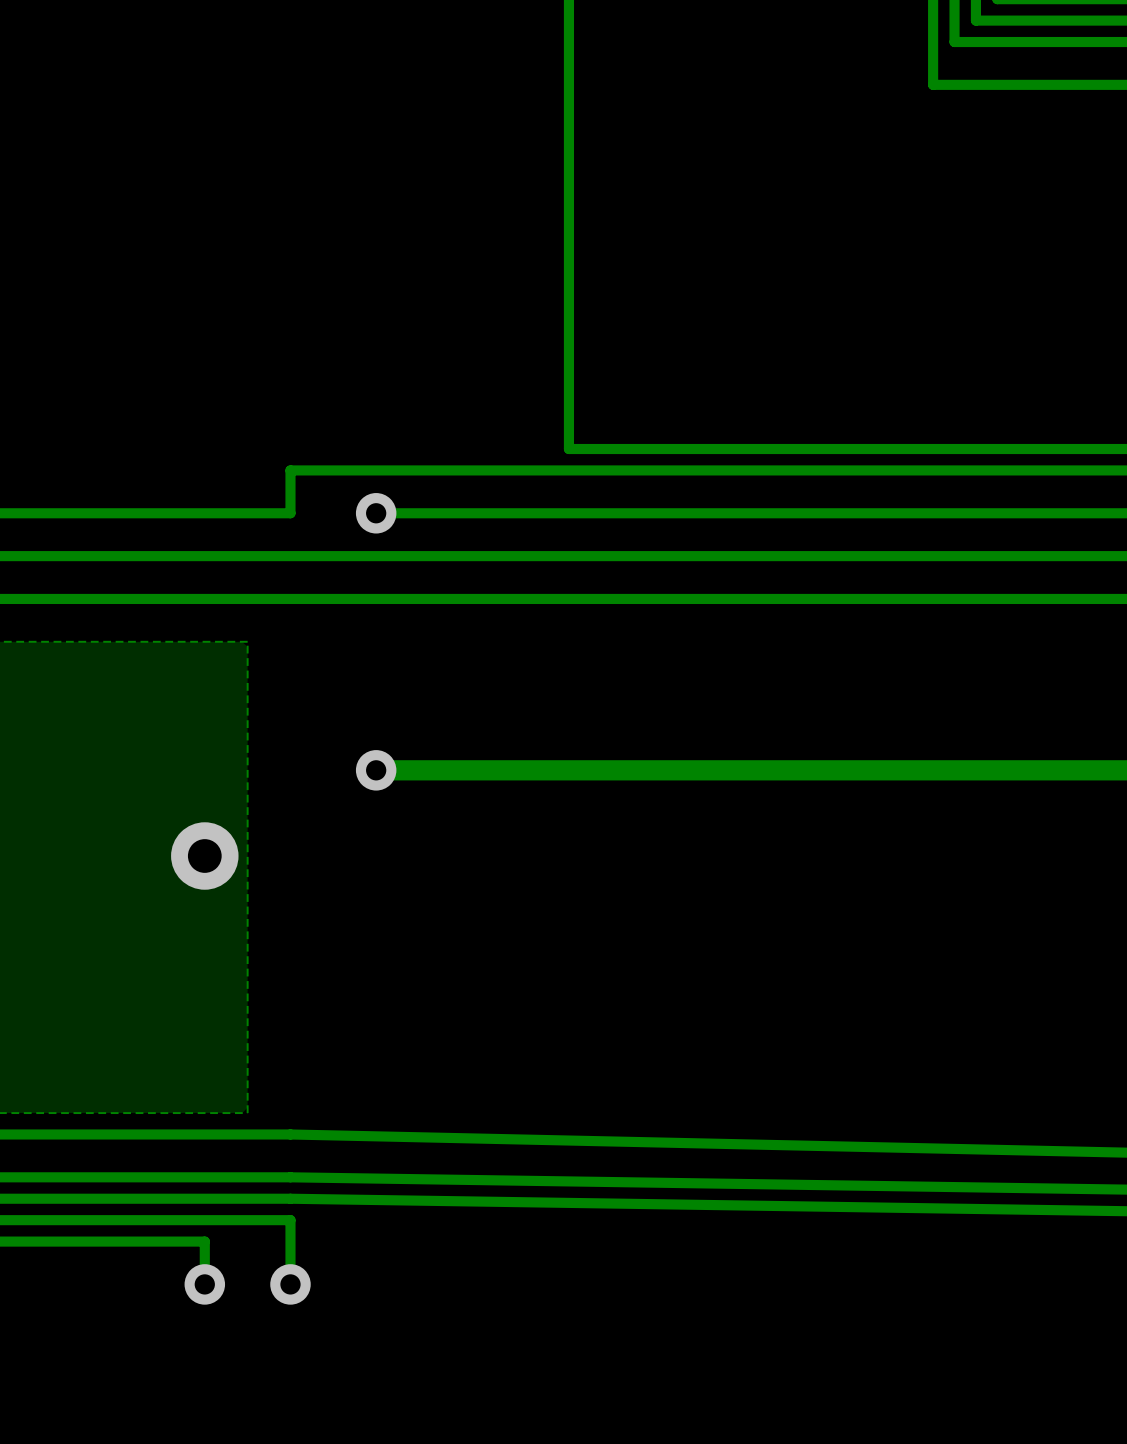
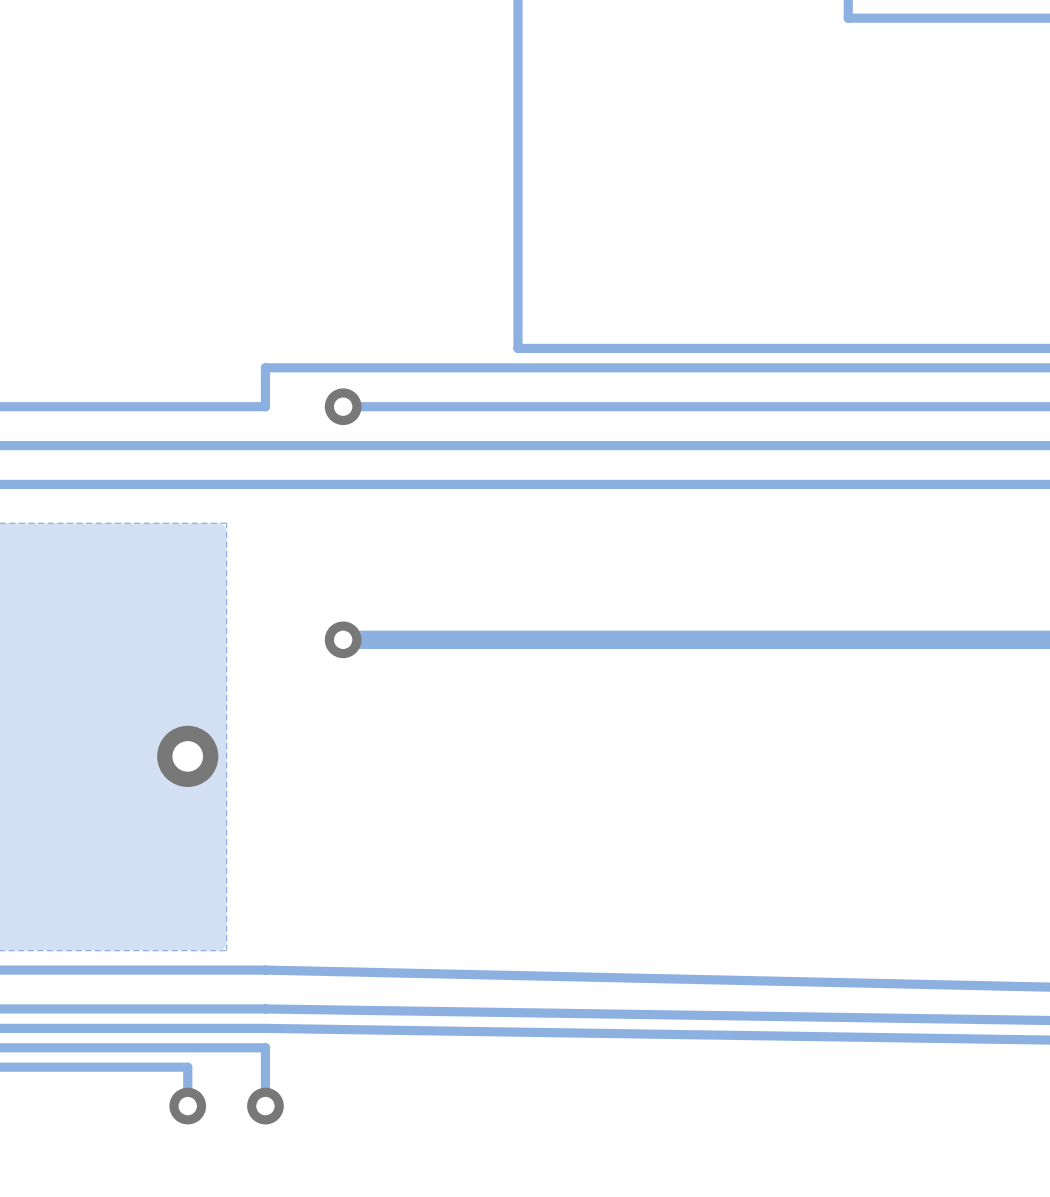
via position: (204, 856) -> (187, 756)

